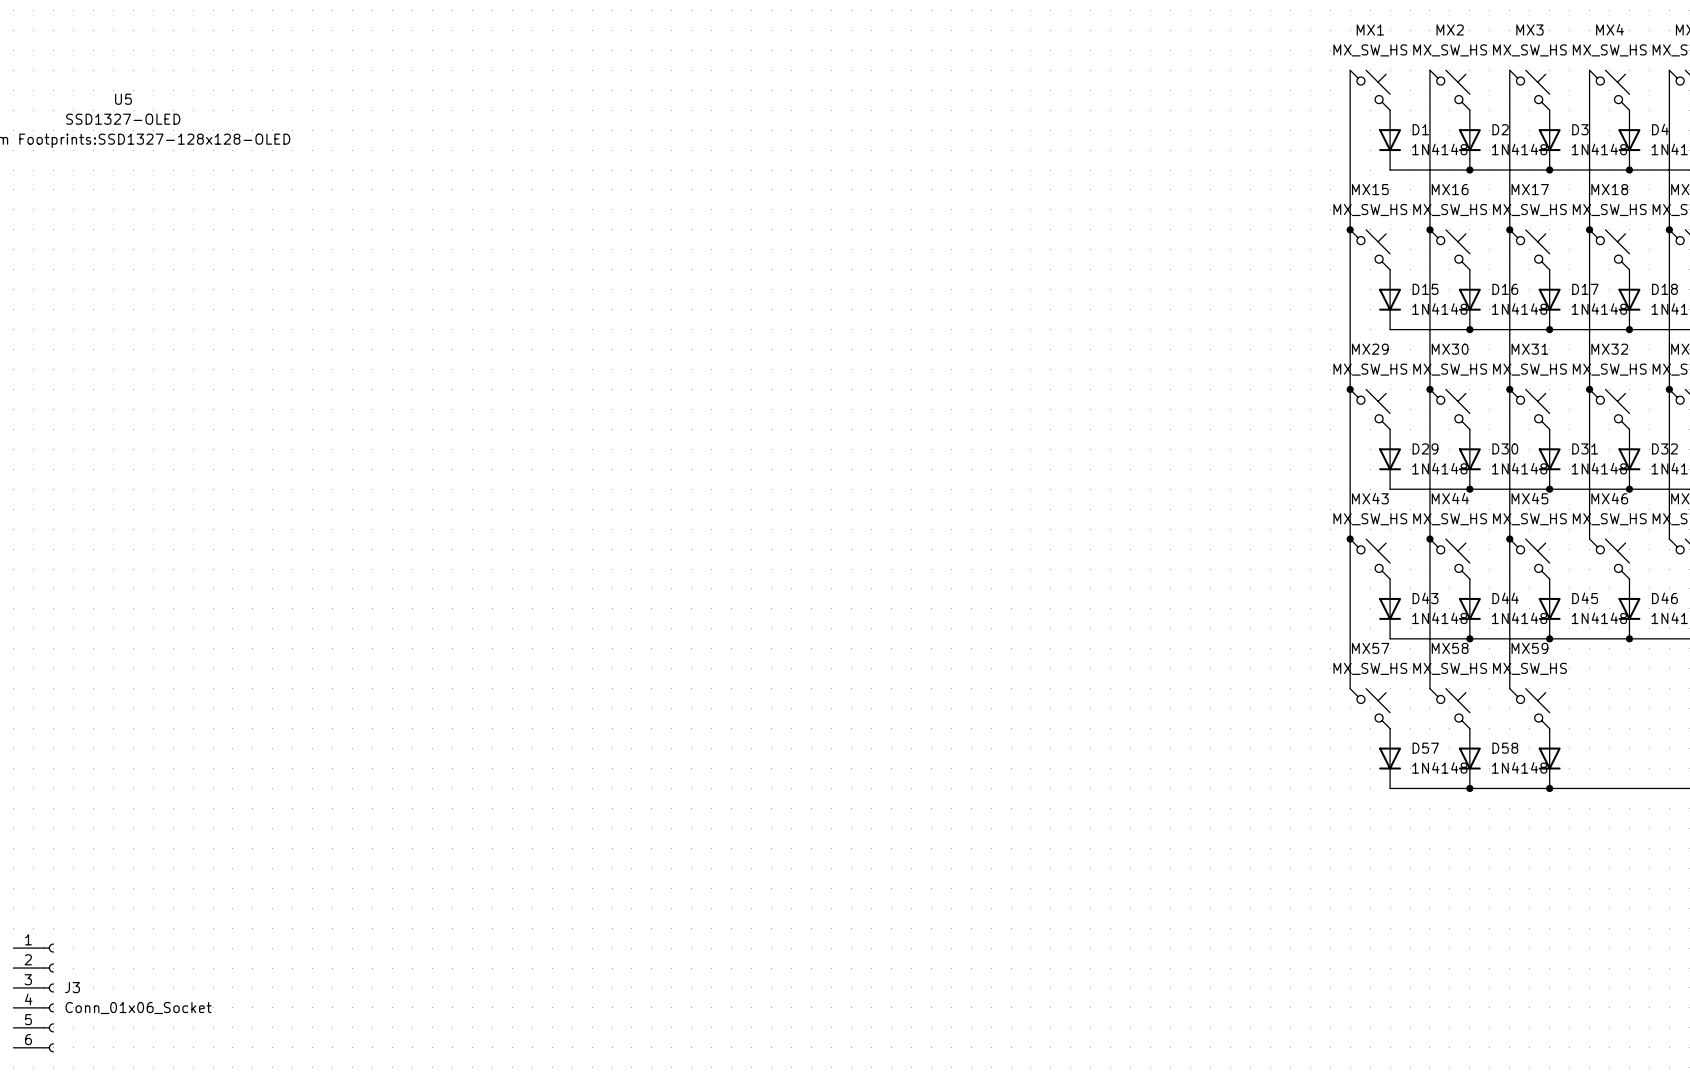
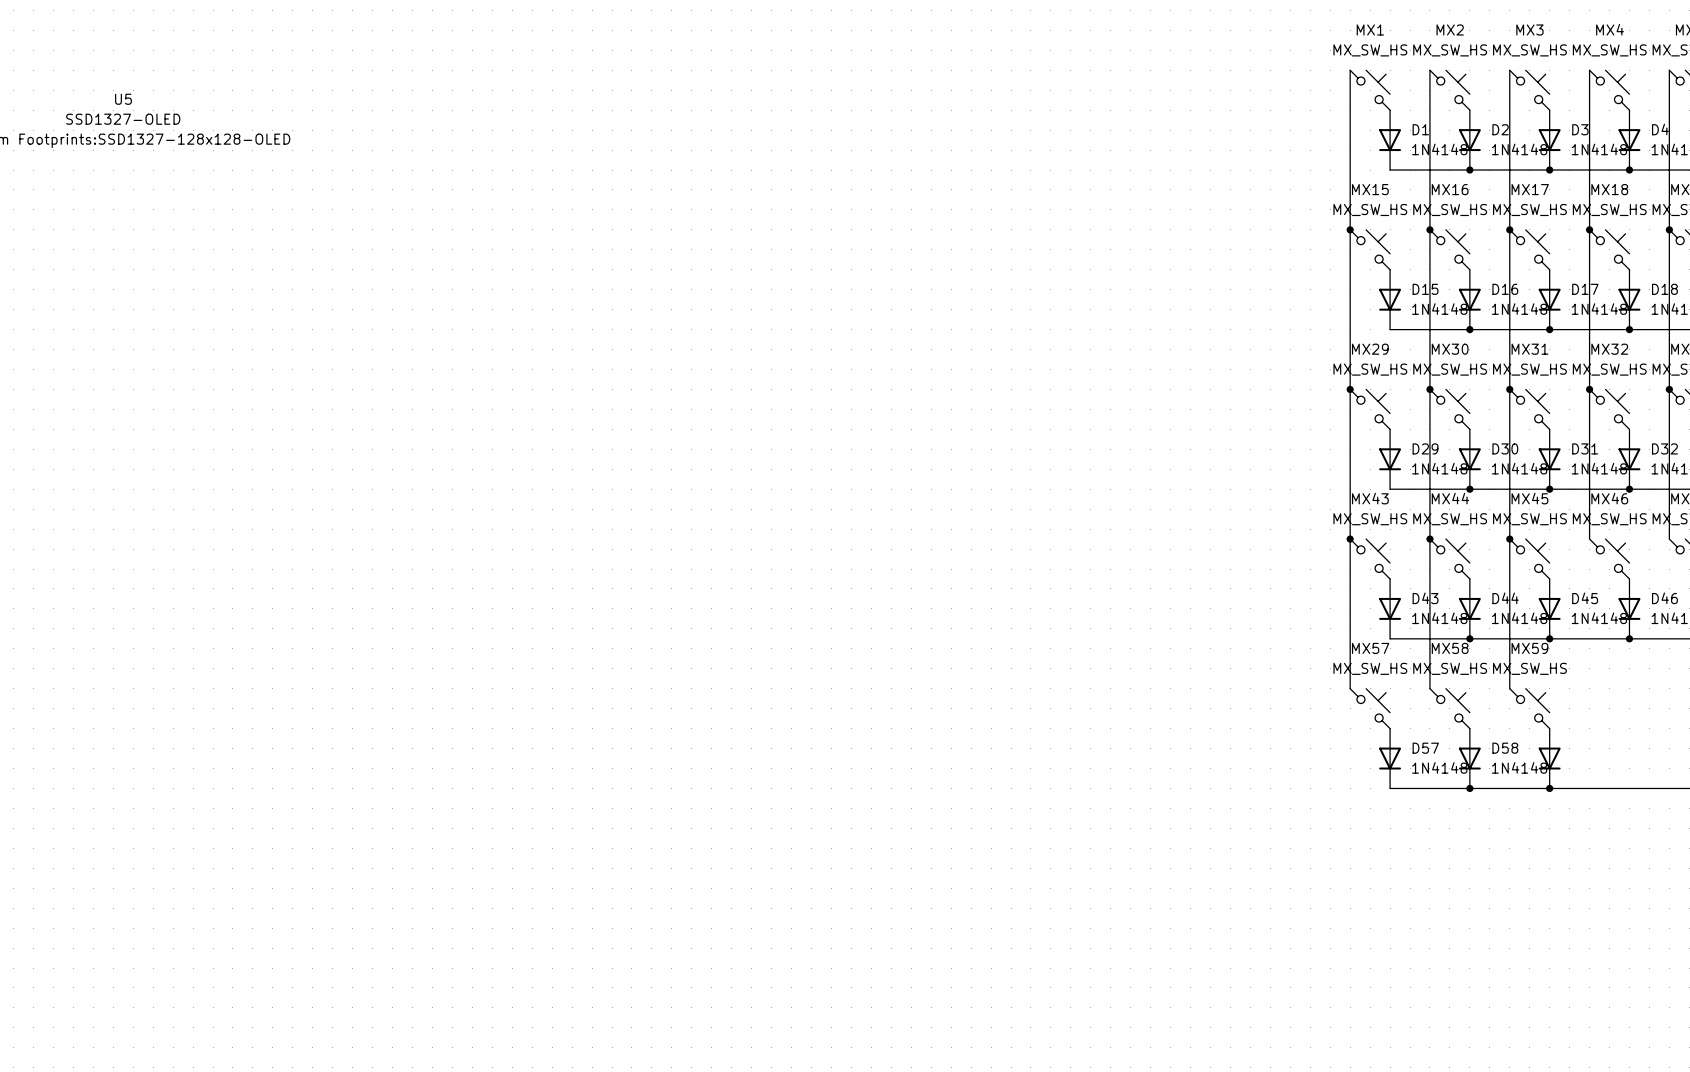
J3: Conn_01x06_Socket (33, 997) -> none

